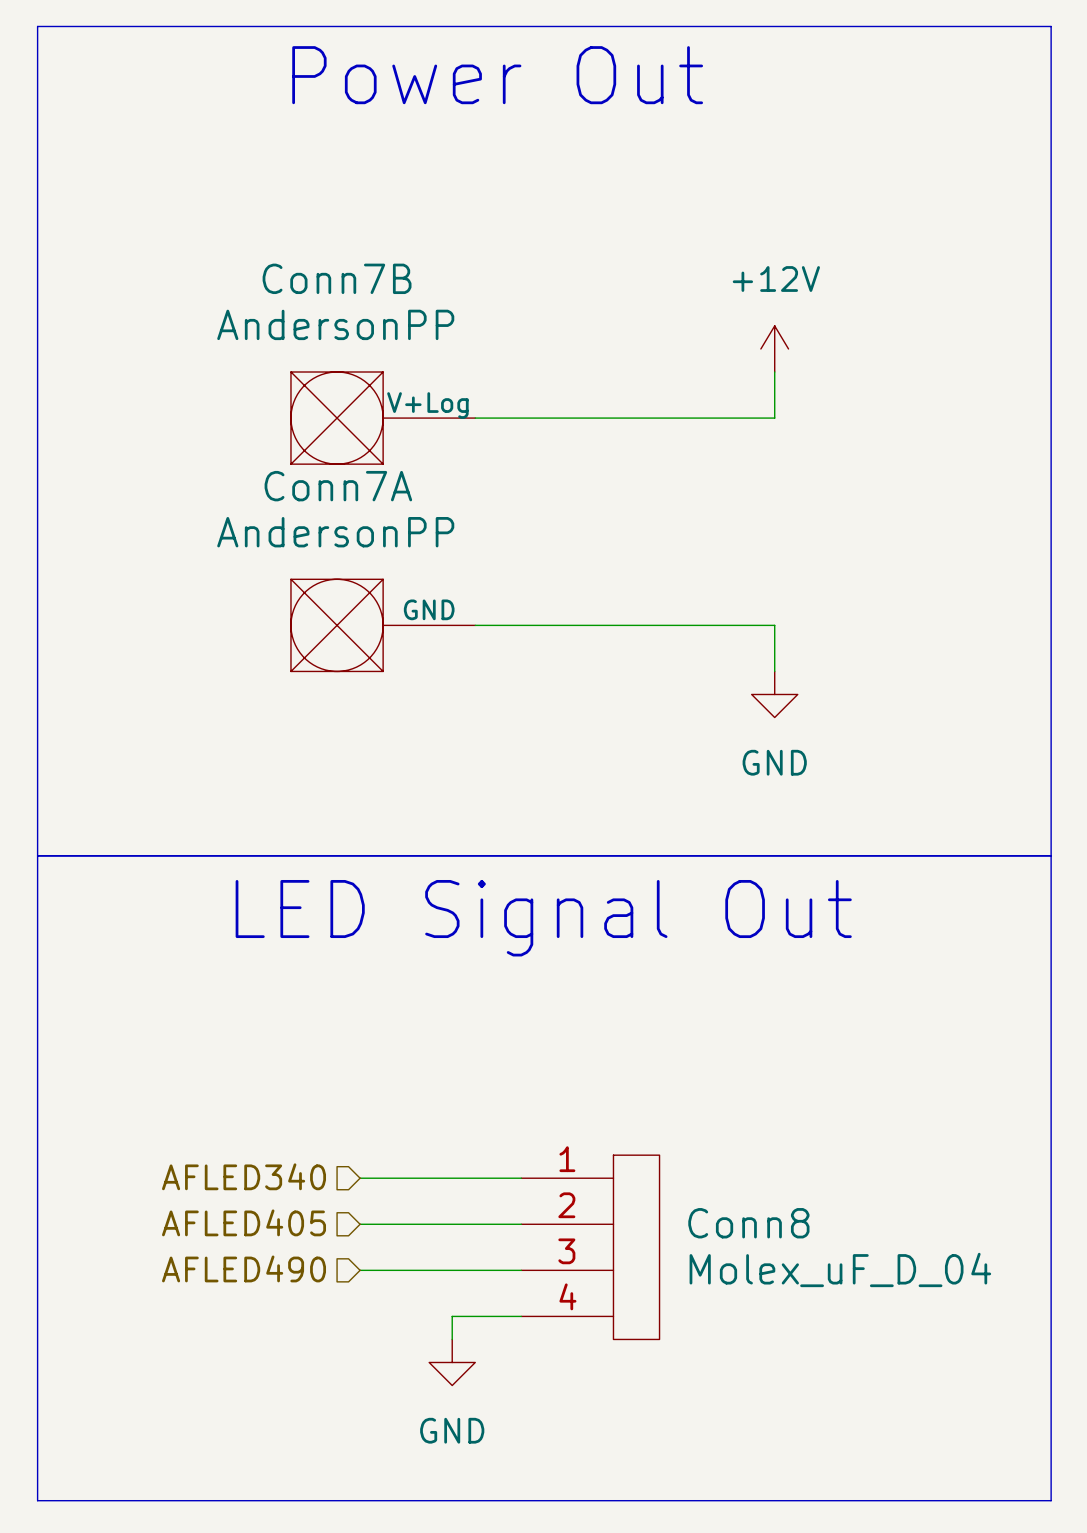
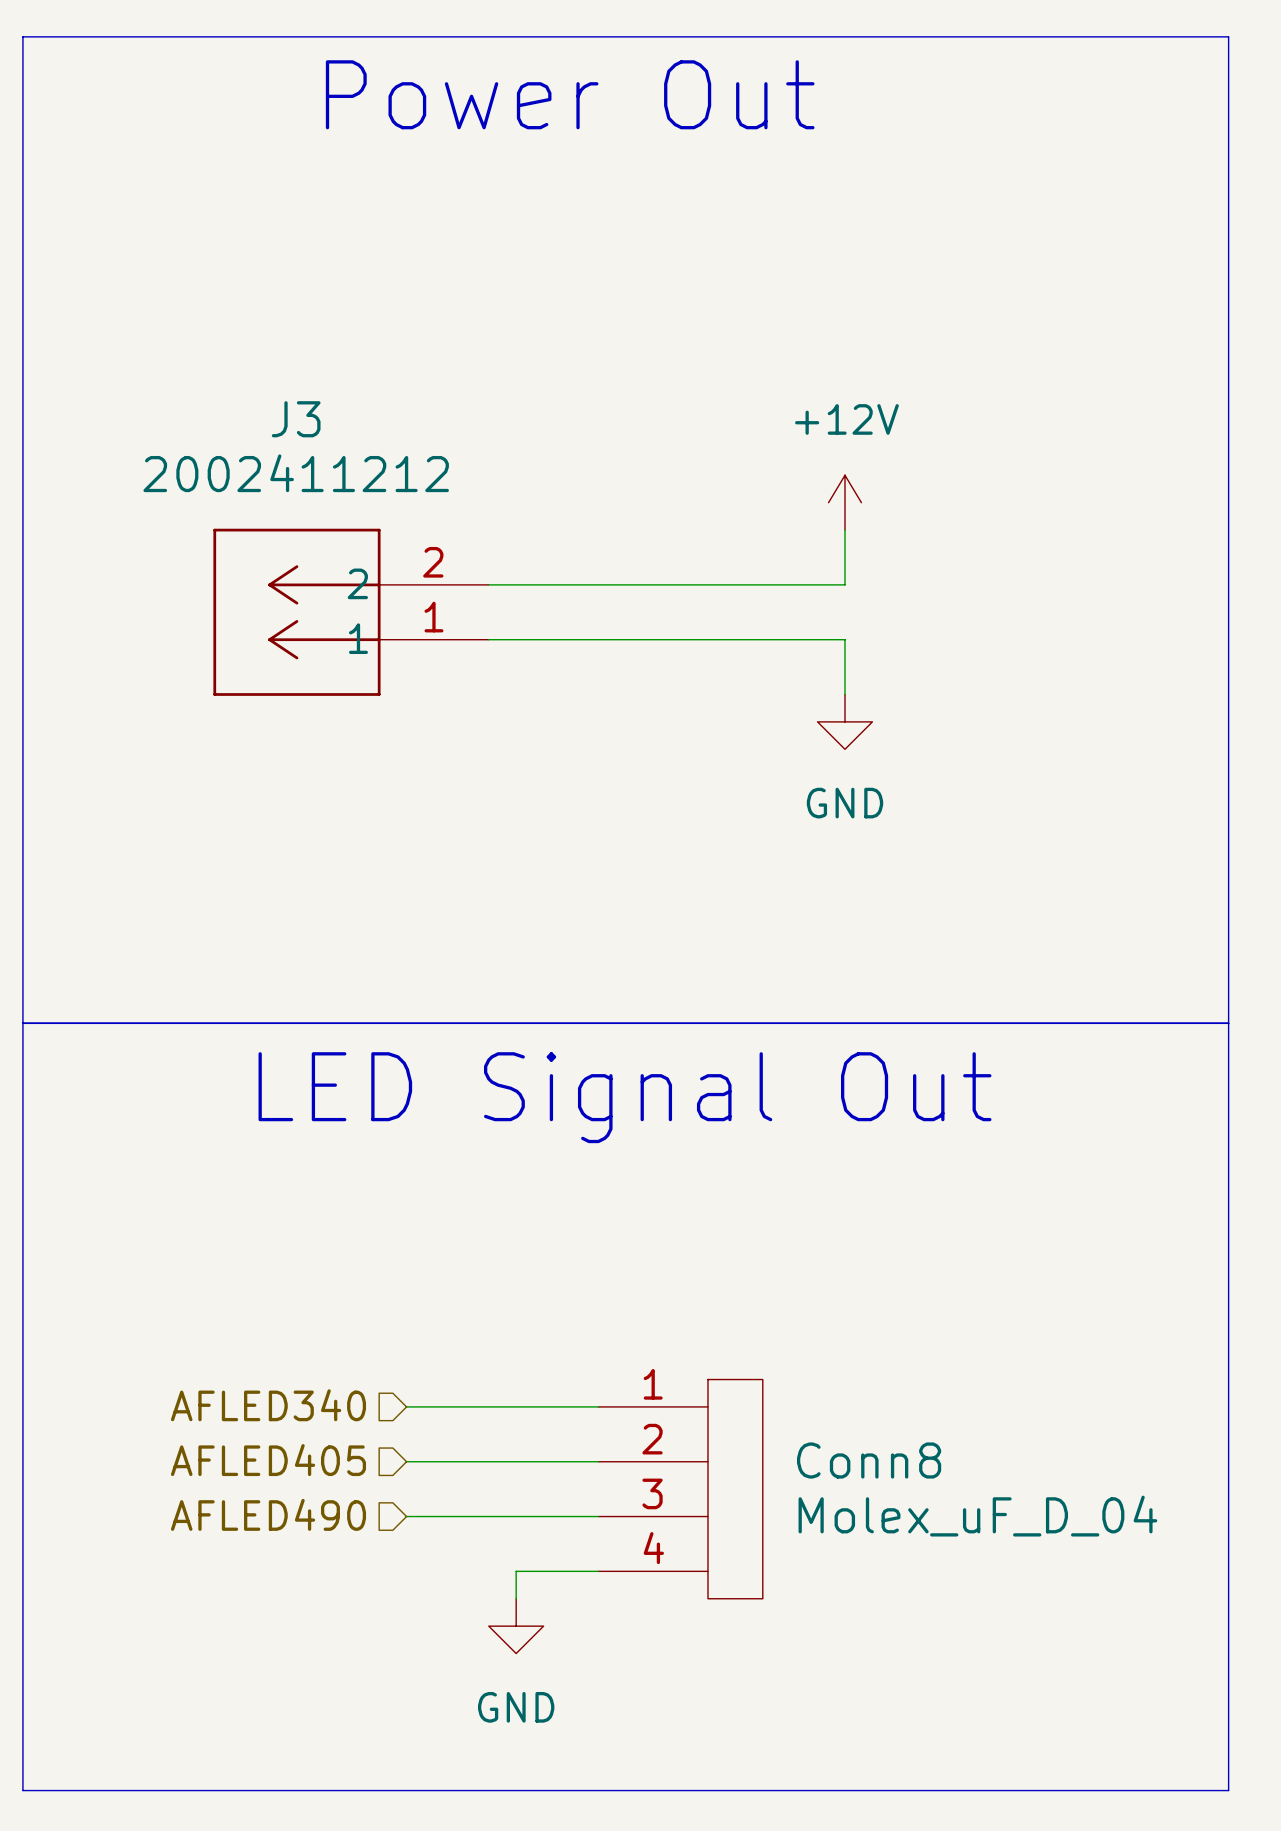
power symbol position: +12V (774, 348) -> +12V (844, 502)
wire: (774, 372) (774, 418) (475, 418) -> (844, 530) (844, 584) (488, 584)
Conn7B: AndersonPP (383, 418) -> none
J3: none -> 2002411212 (351, 612)
Conn7A: AndersonPP (383, 625) -> none
wire: (475, 625) (774, 625) (774, 671) -> (488, 639) (844, 639) (844, 694)
power symbol position: GND (774, 694) -> GND (844, 721)

